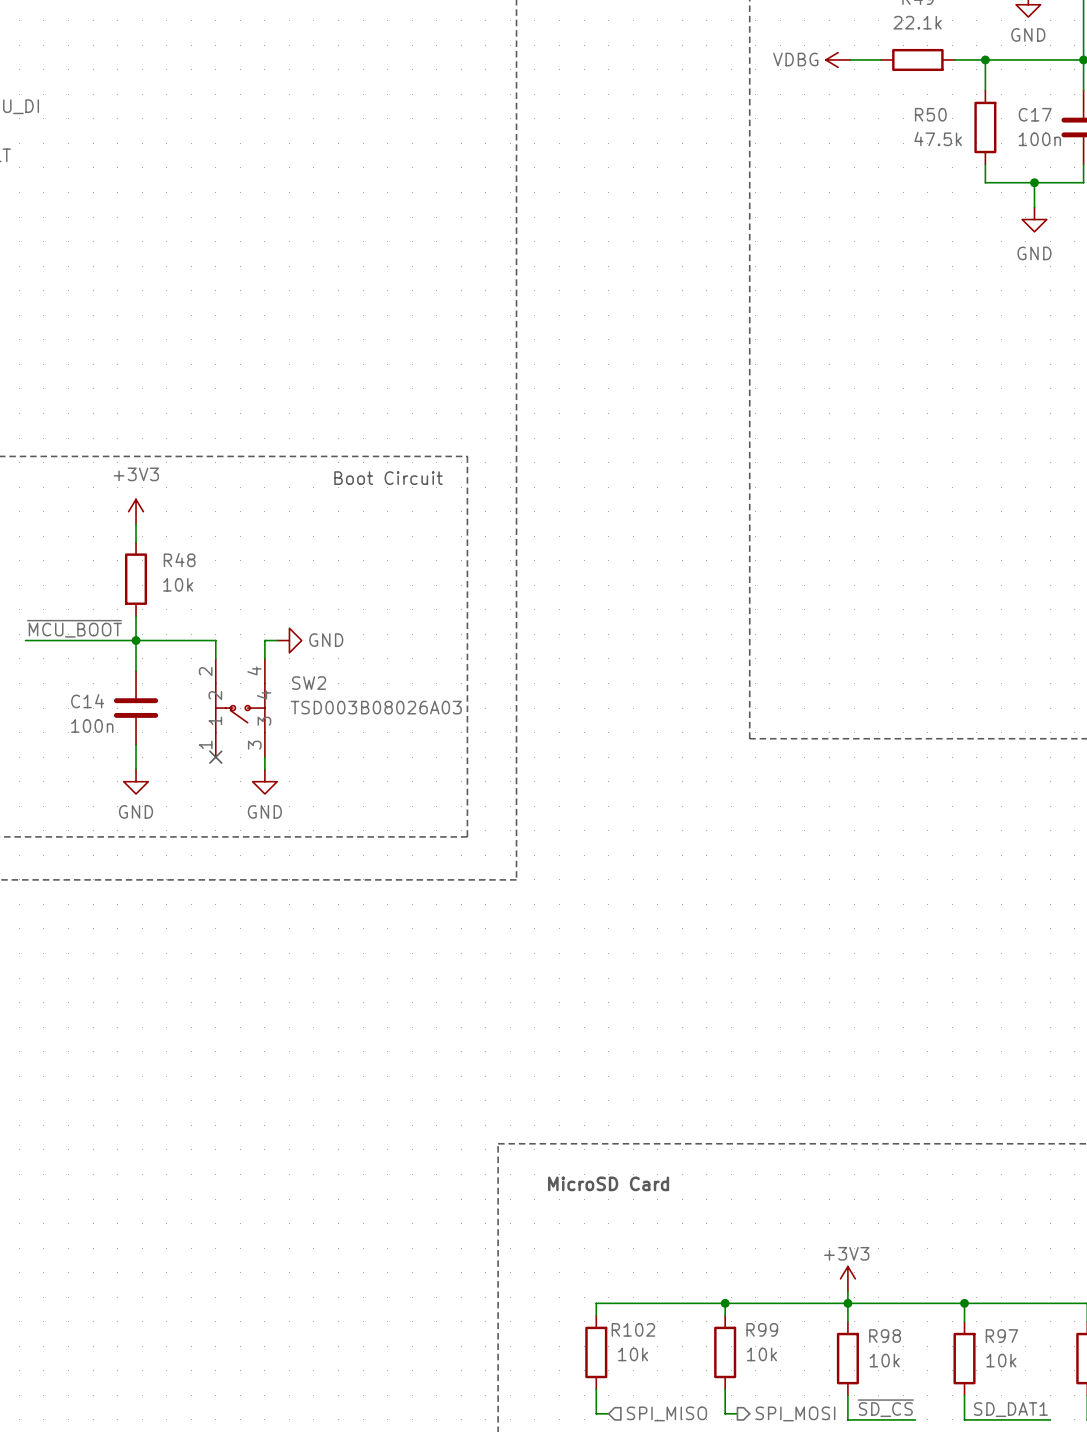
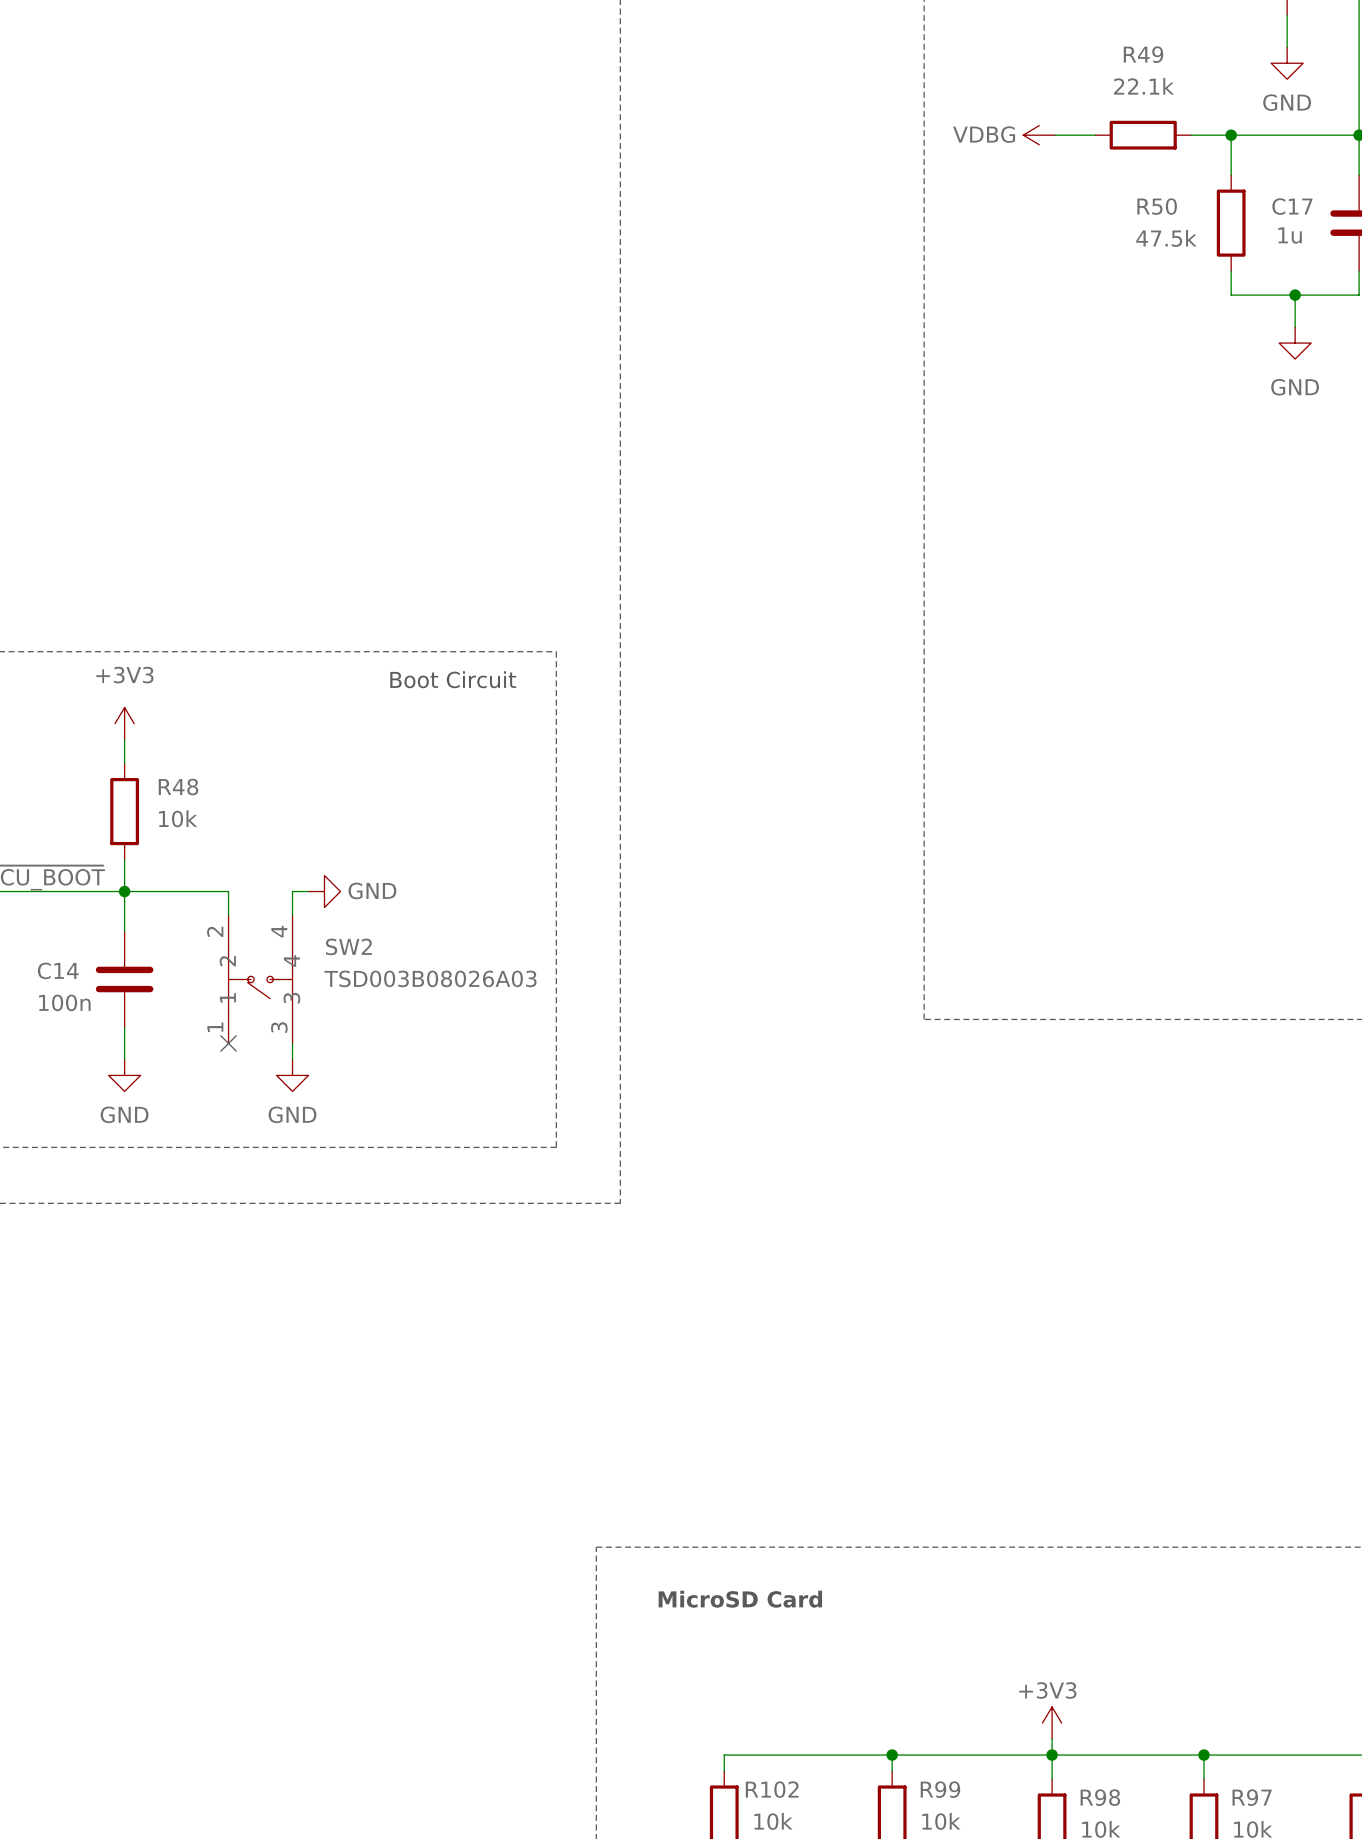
C17 value: 100n (1039, 139) -> 1u (1290, 235)

